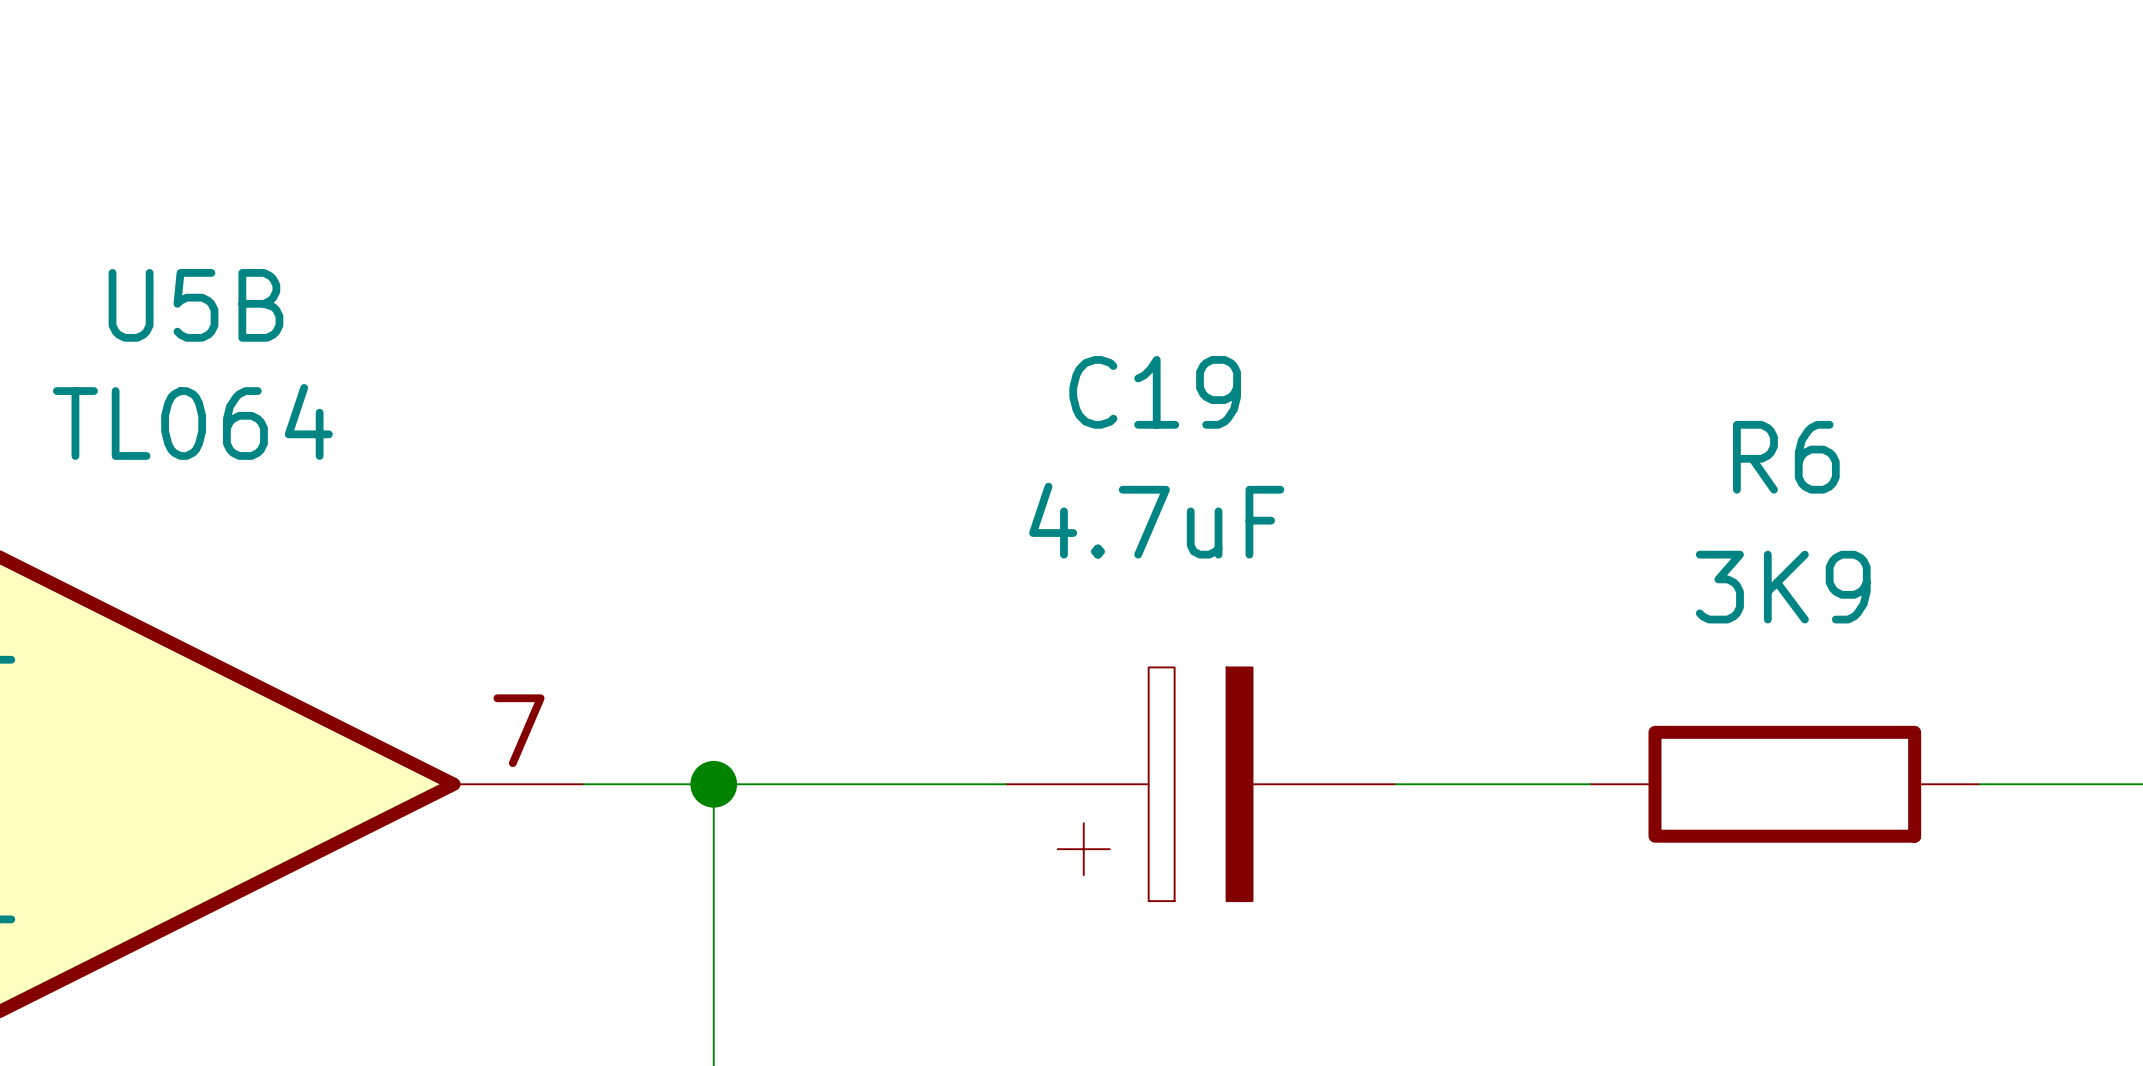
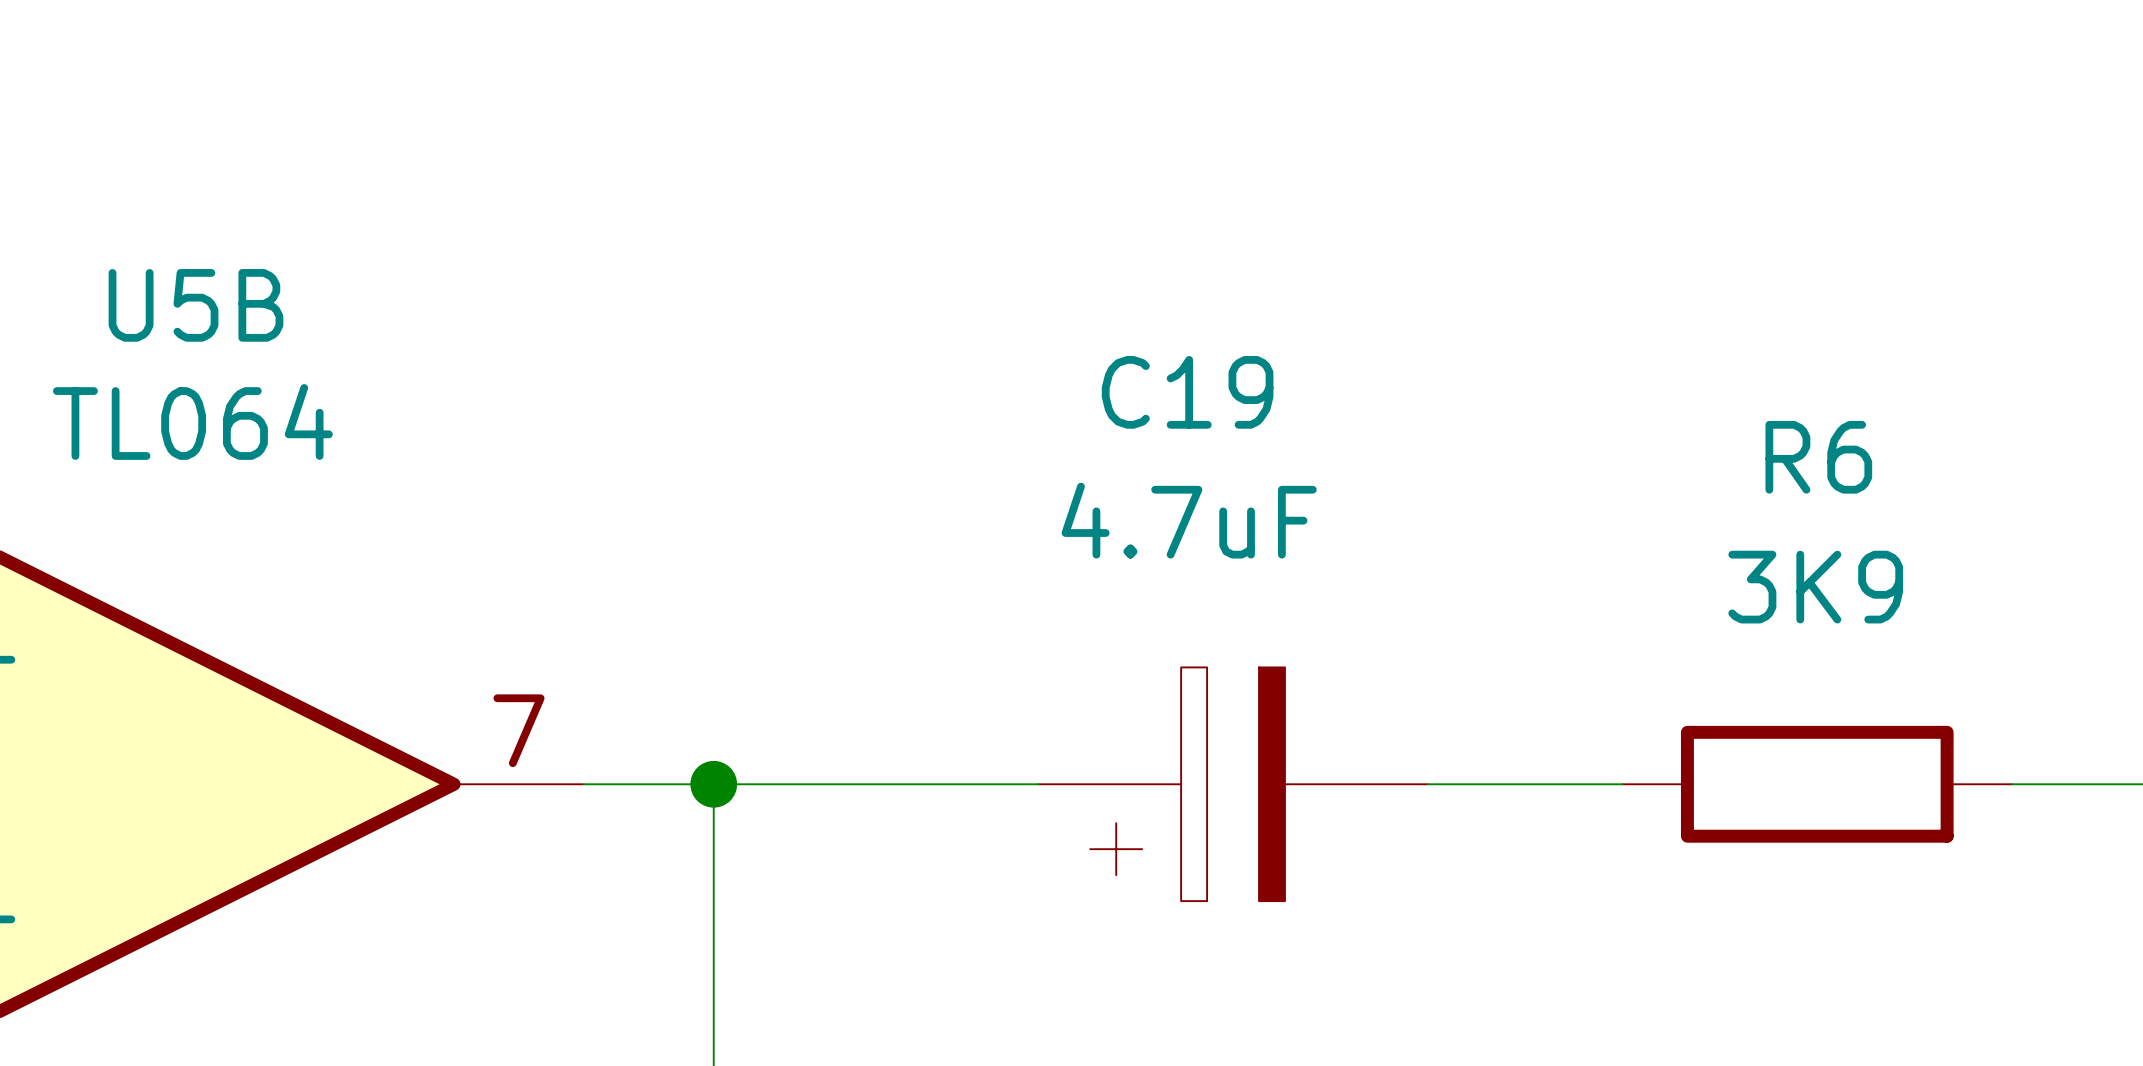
C19 position: (1200, 784) -> (1233, 784)
R6 position: (1784, 784) -> (1817, 784)

